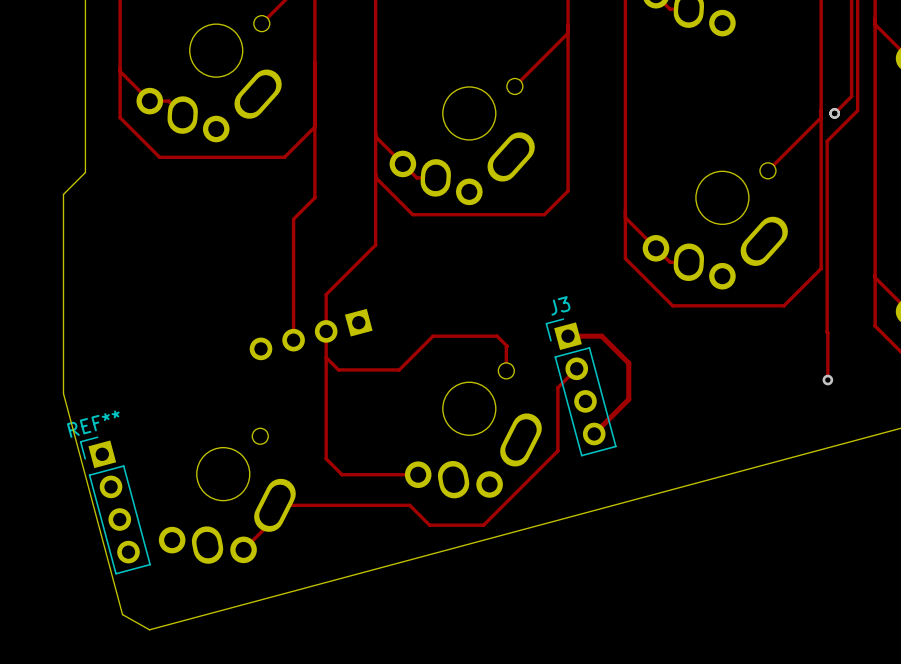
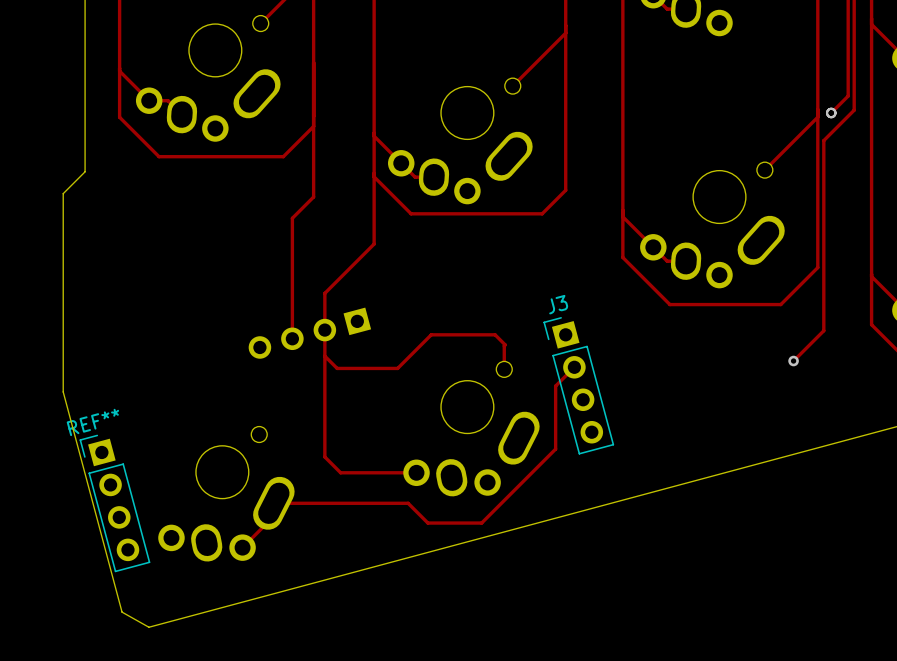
track: (827, 332) (827, 380) -> (823, 330) (793, 361)
track: (568, 336) (601, 336) (628, 363) (628, 399) (594, 433) -> none
via position: (827, 380) -> (793, 361)

